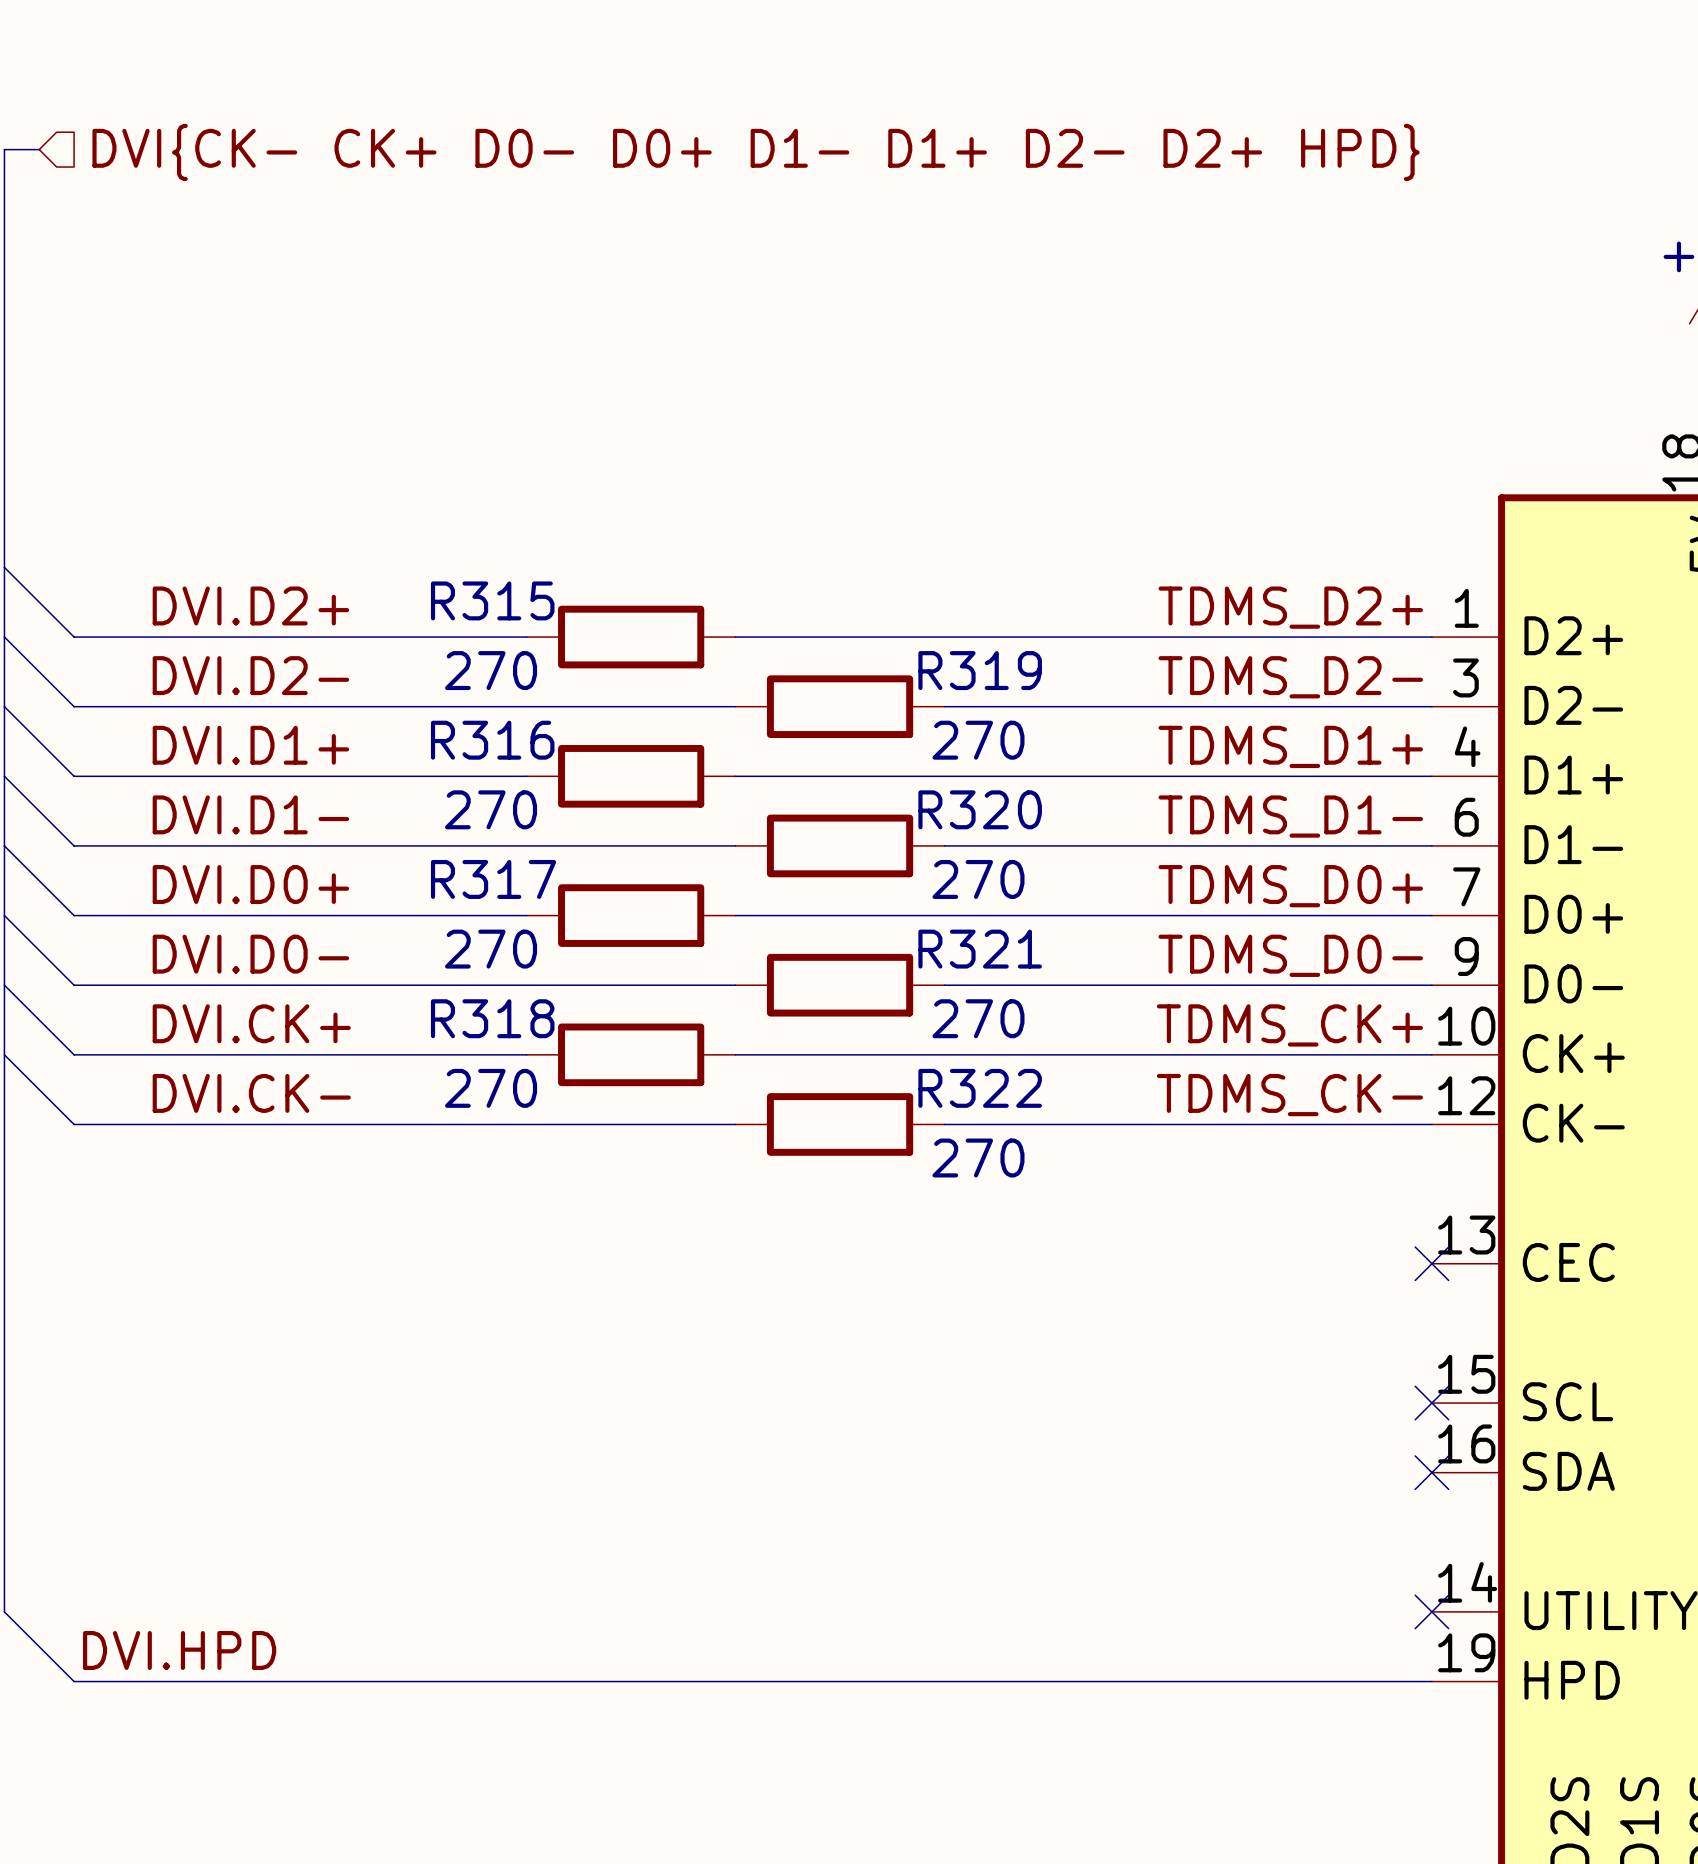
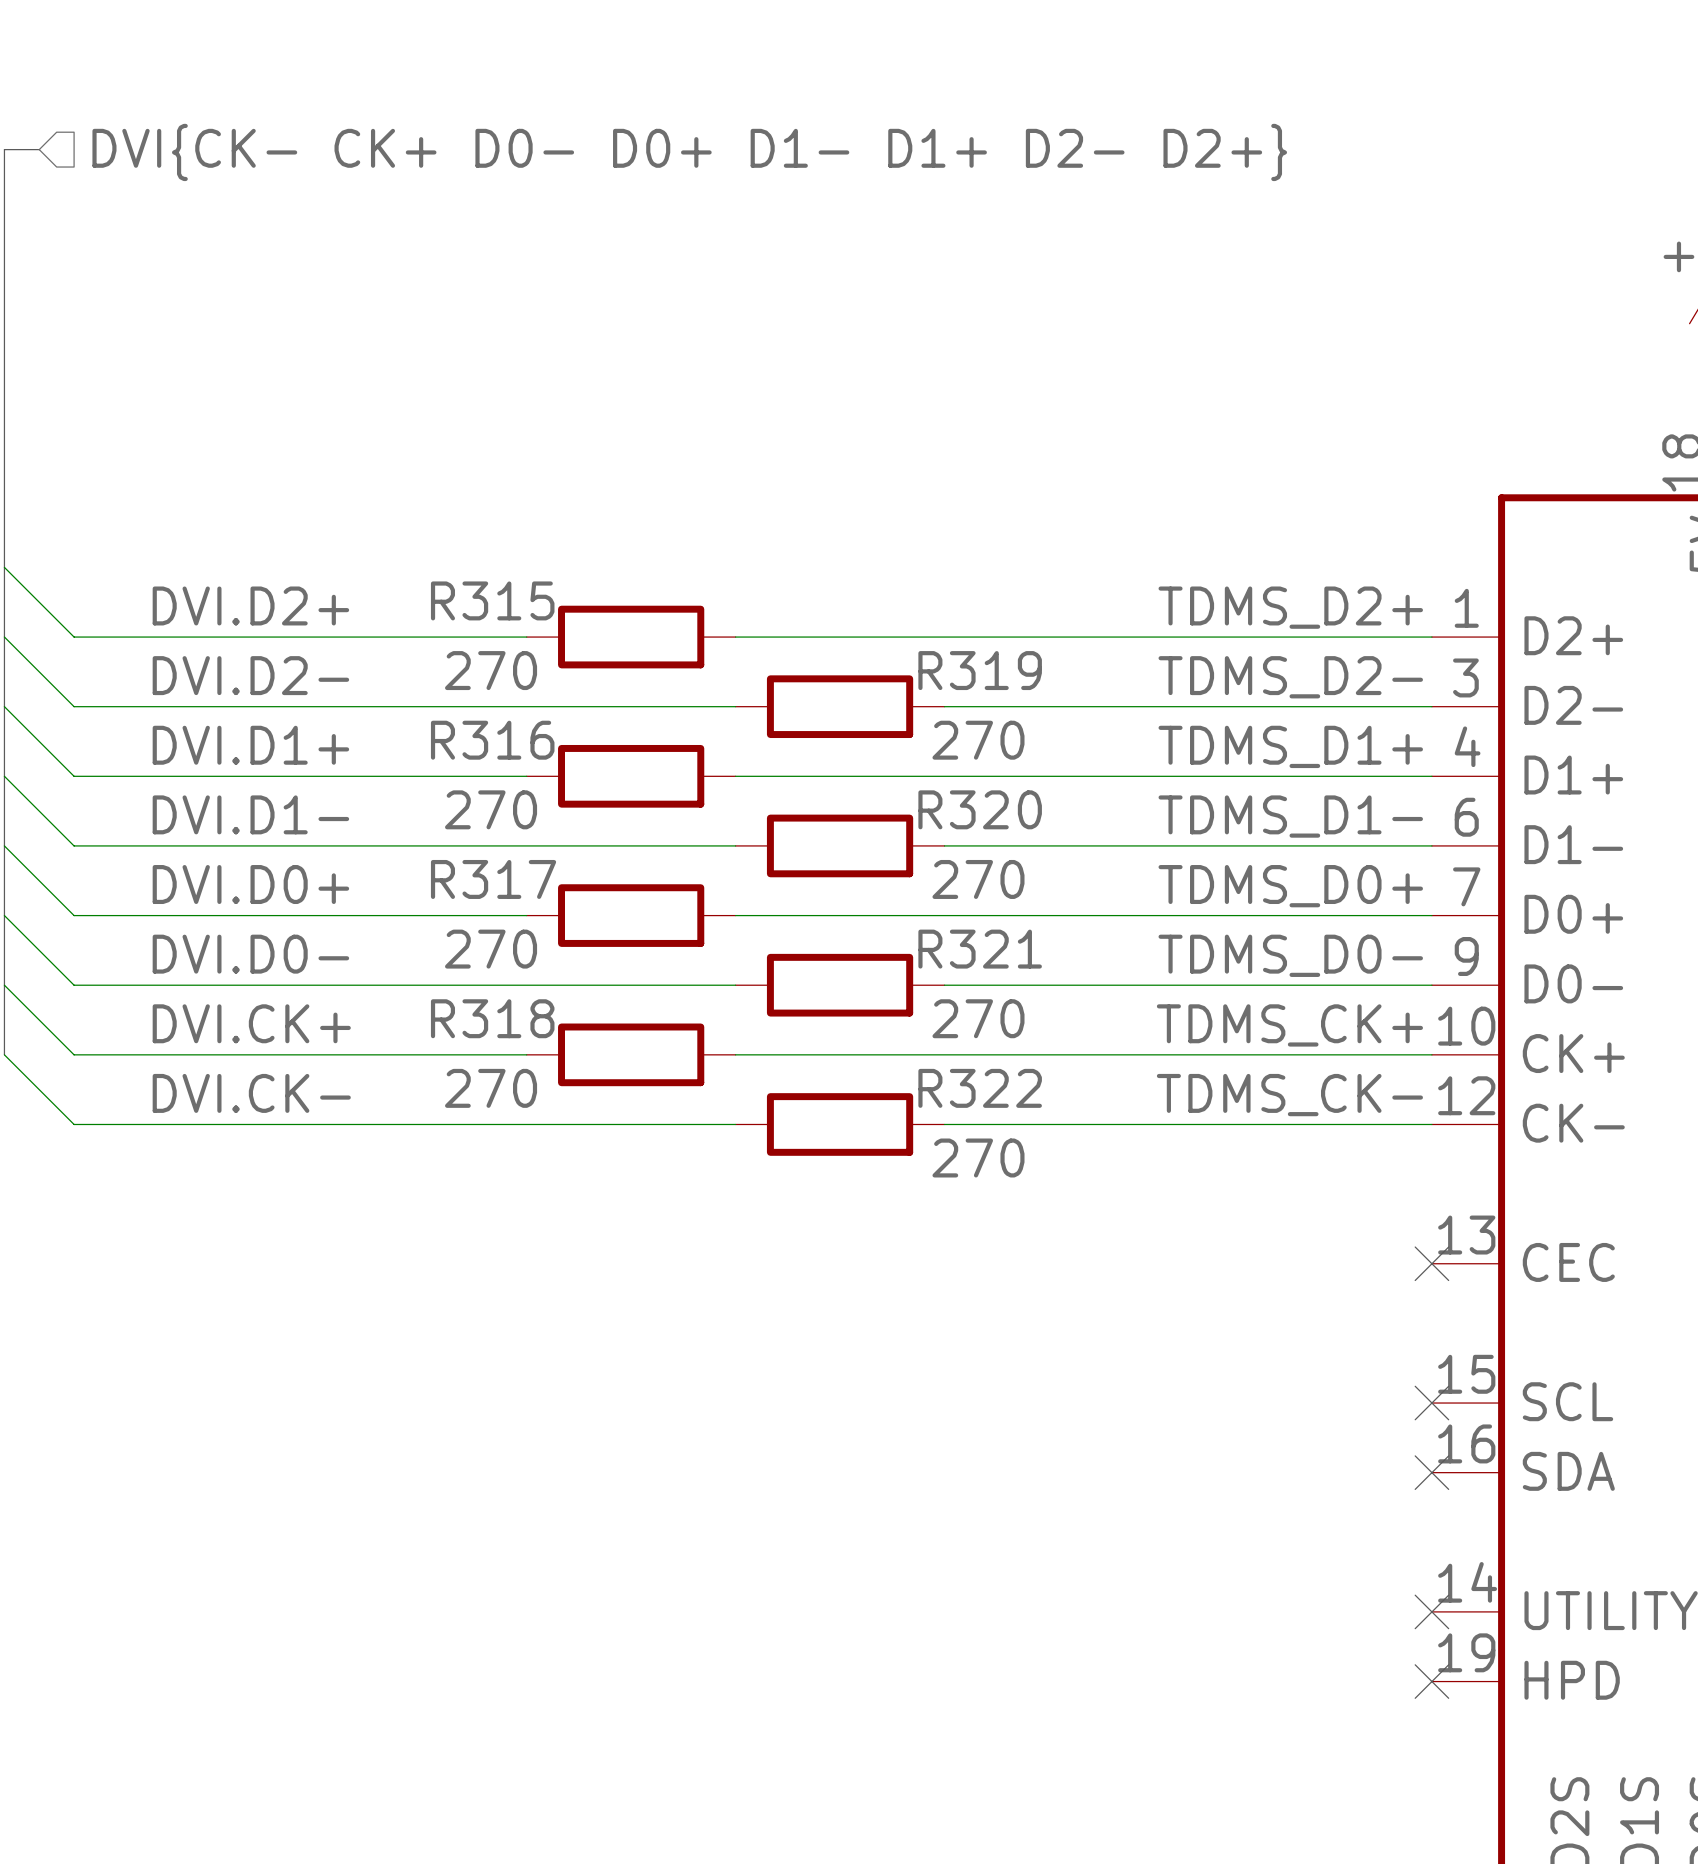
hierarchical label: DVI{CK- CK+ D0- D0+ D1- D1+ D2- D2+ HPD} (756, 152) -> DVI{CK- CK+ D0- D0+ D1- D1+ D2- D2+} (689, 152)
bus: (4, 1054) (4, 1611) -> none
wire: (4, 1611) (74, 1681) (1431, 1681) -> none
label: DVI.HPD (179, 1650) -> none
no-connect mark: none -> (1431, 1681)

